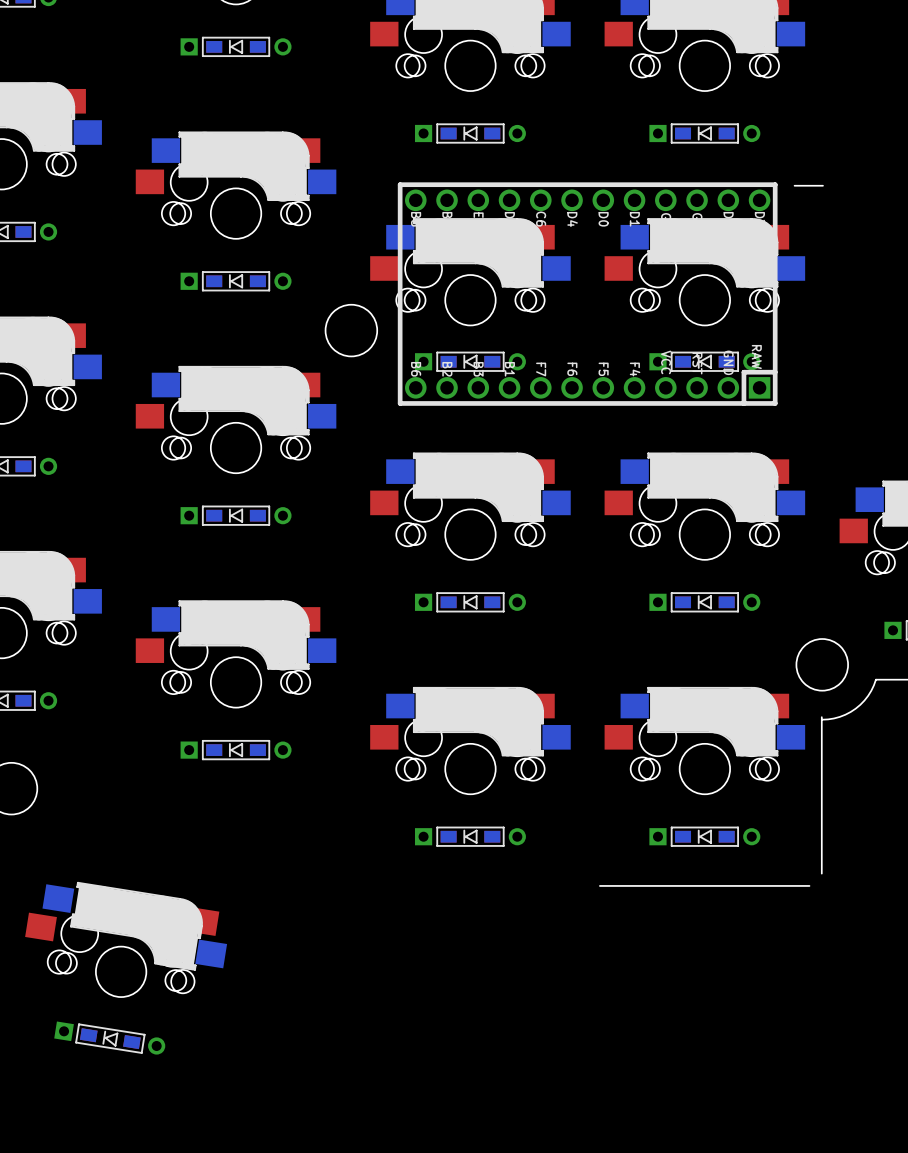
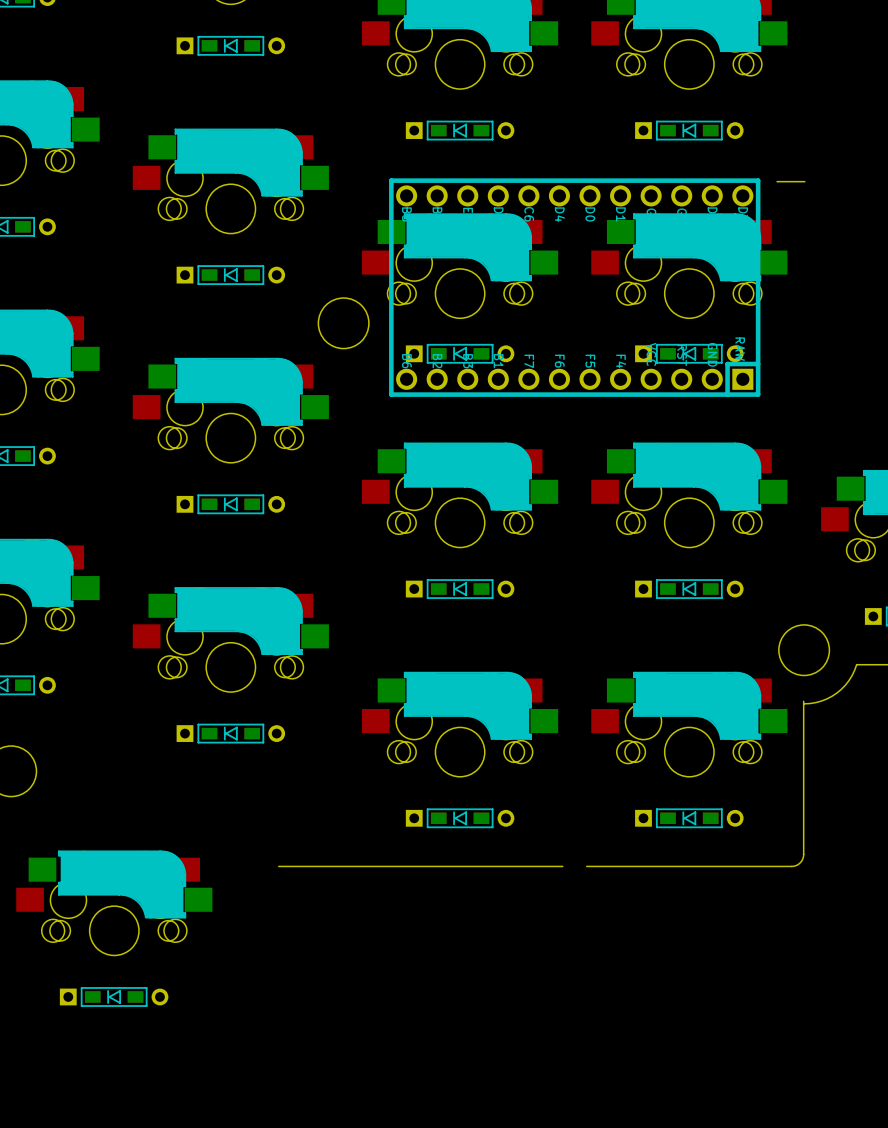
board edge: none -> (803, 854) (800, 862) (791, 866)
board edge: none -> (562, 866) (278, 866)
part: none -> (114, 902)
part: (126, 939) -> none
part: none -> (114, 996)
part: (109, 1038) -> none

